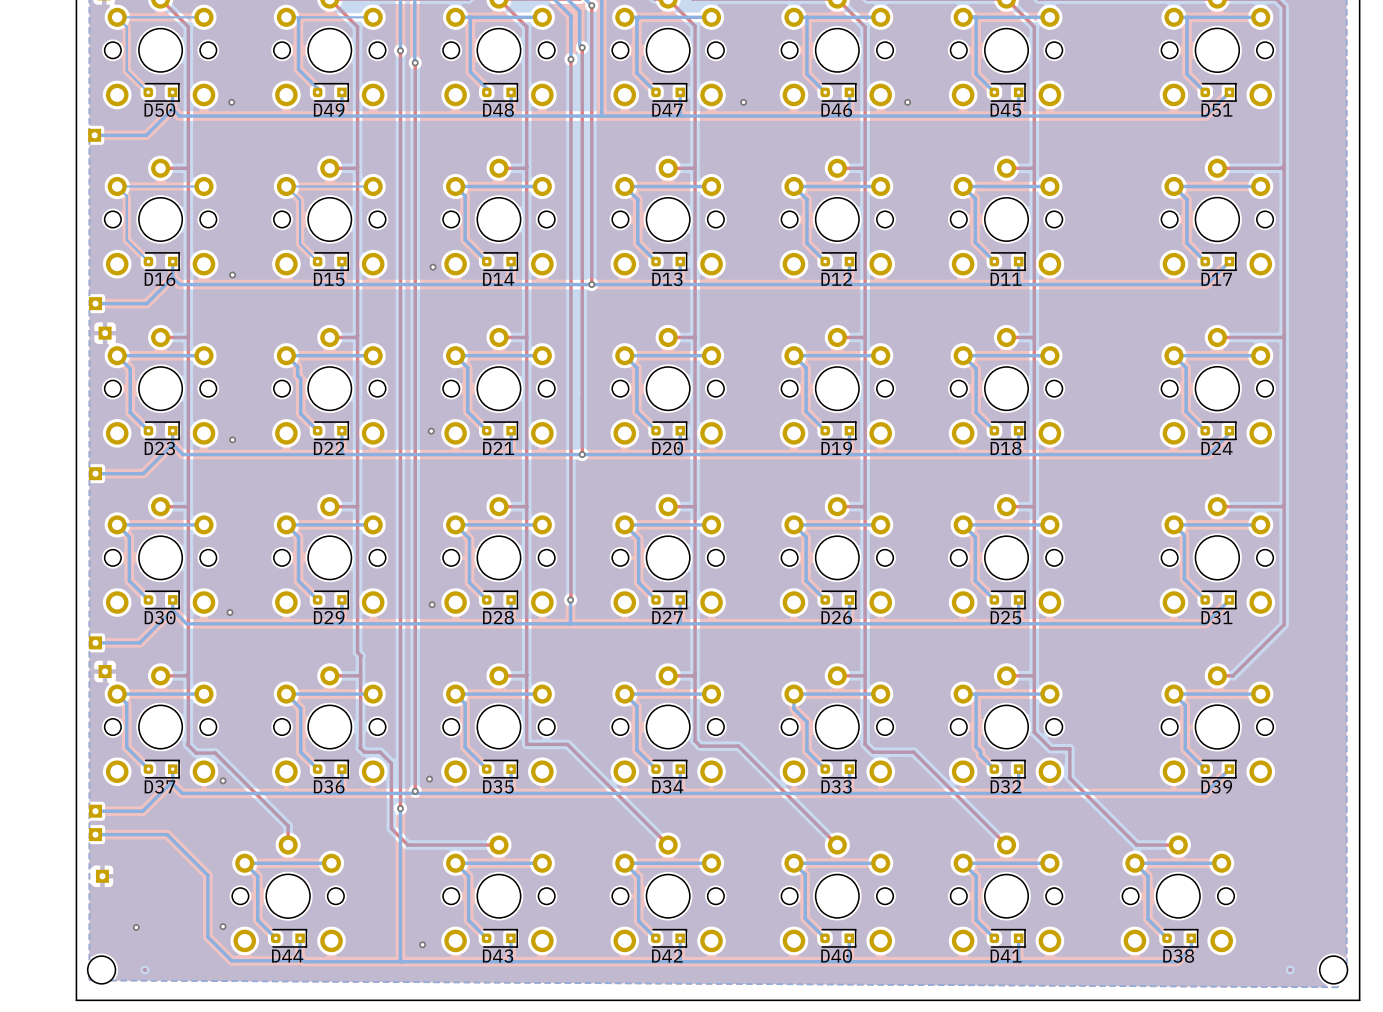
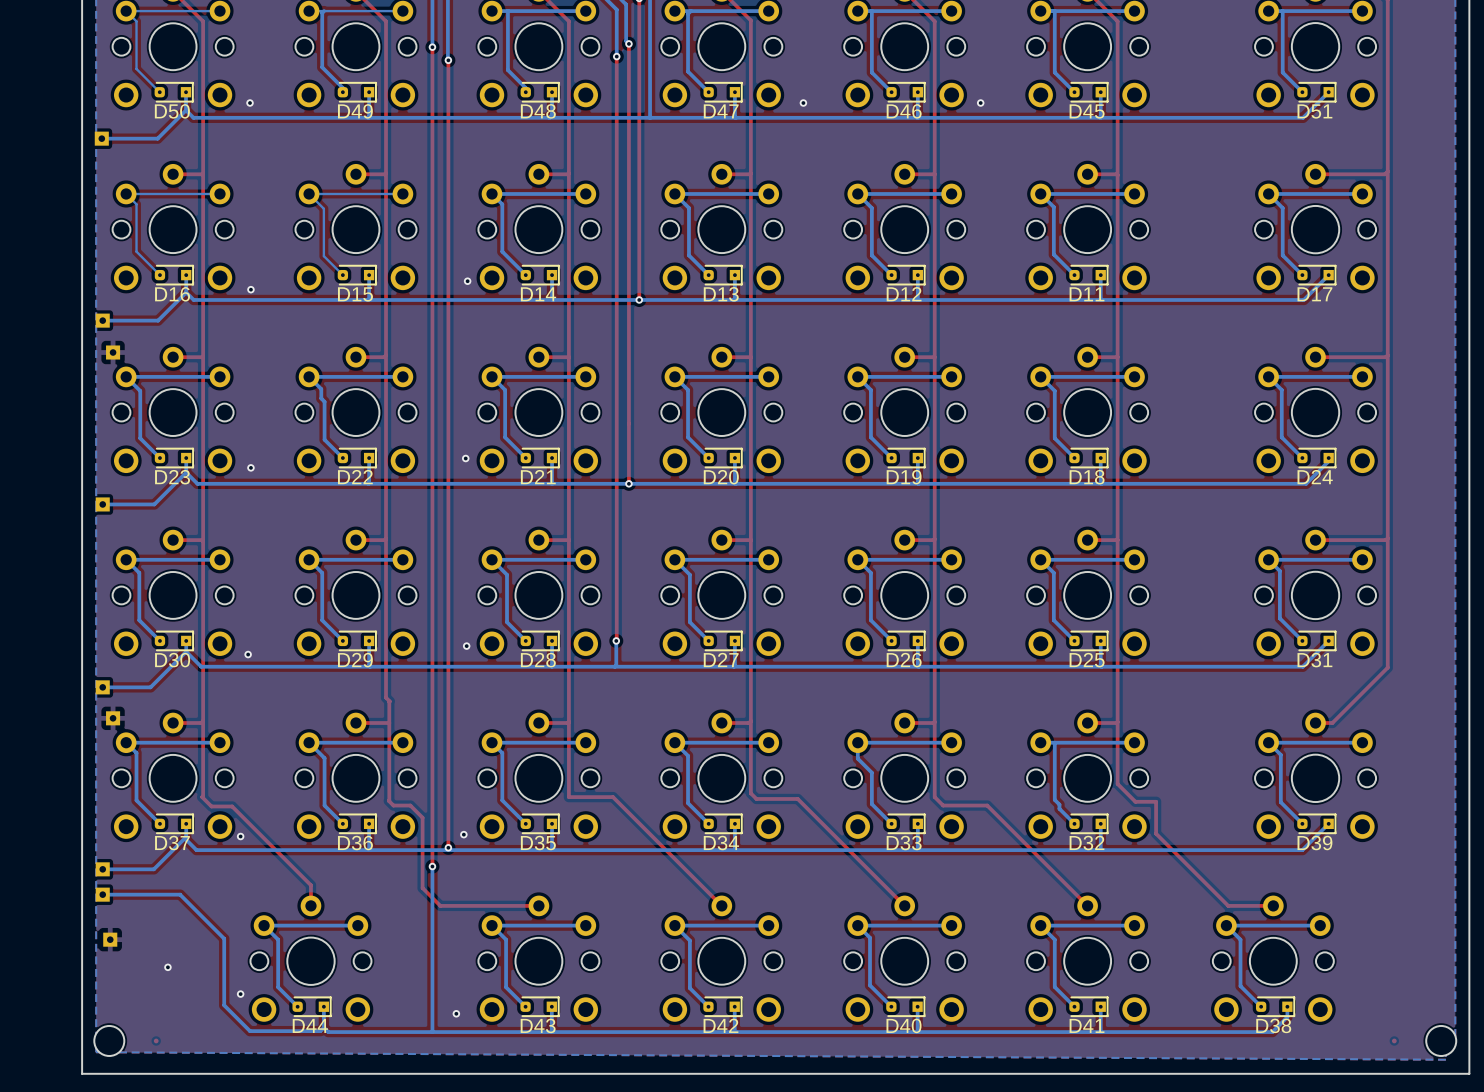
via position: (136, 927) -> (167, 967)

